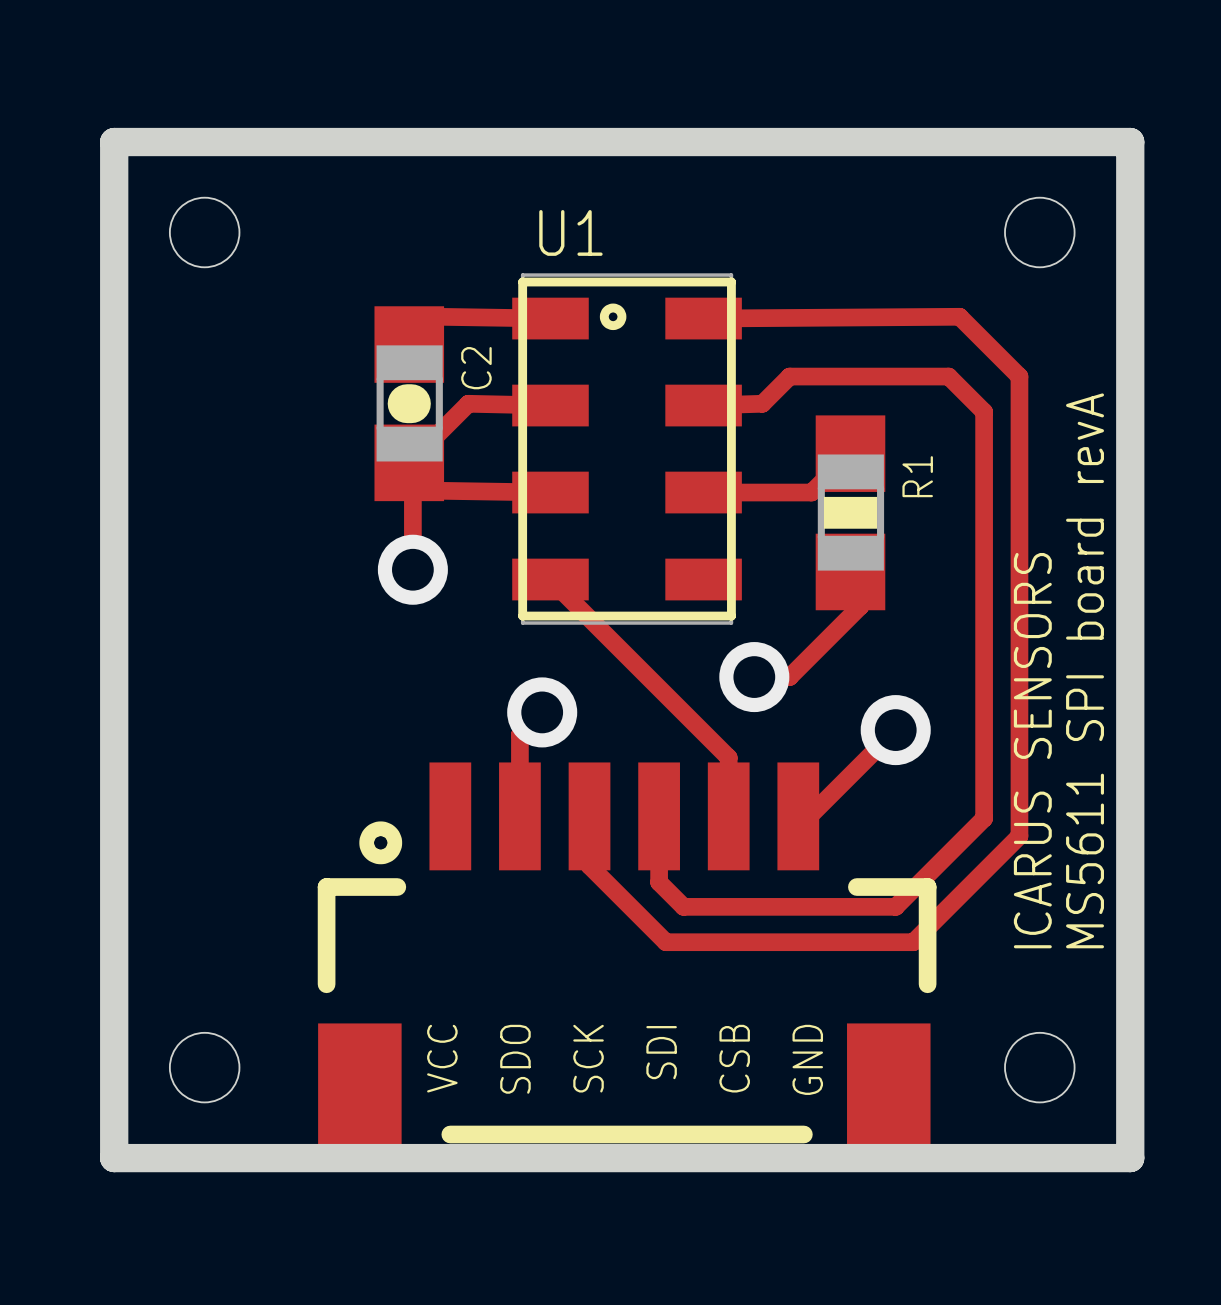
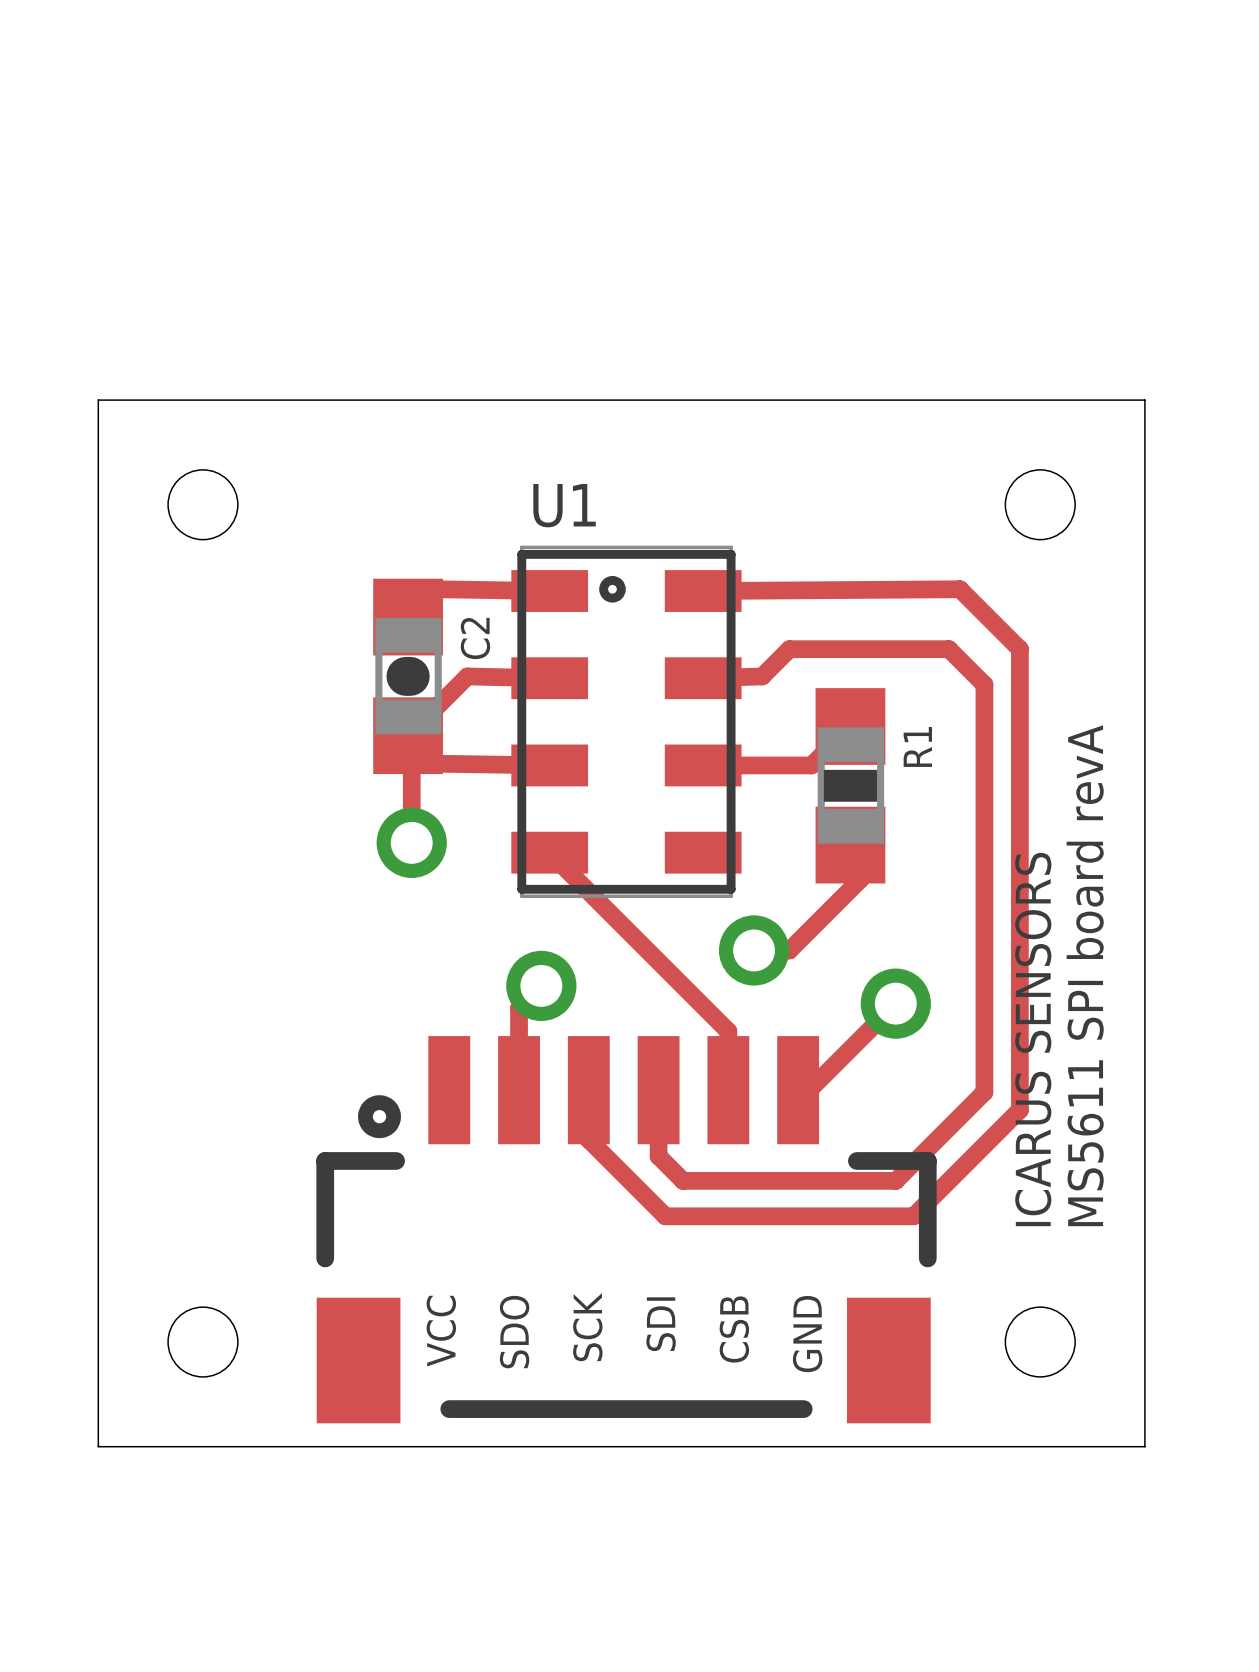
board edge: (114, 142) (114, 1158) (1130, 1158) (1130, 142) (114, 142) -> (98, 400) (98, 1446) (1144, 1446) (1144, 400) (98, 400)

